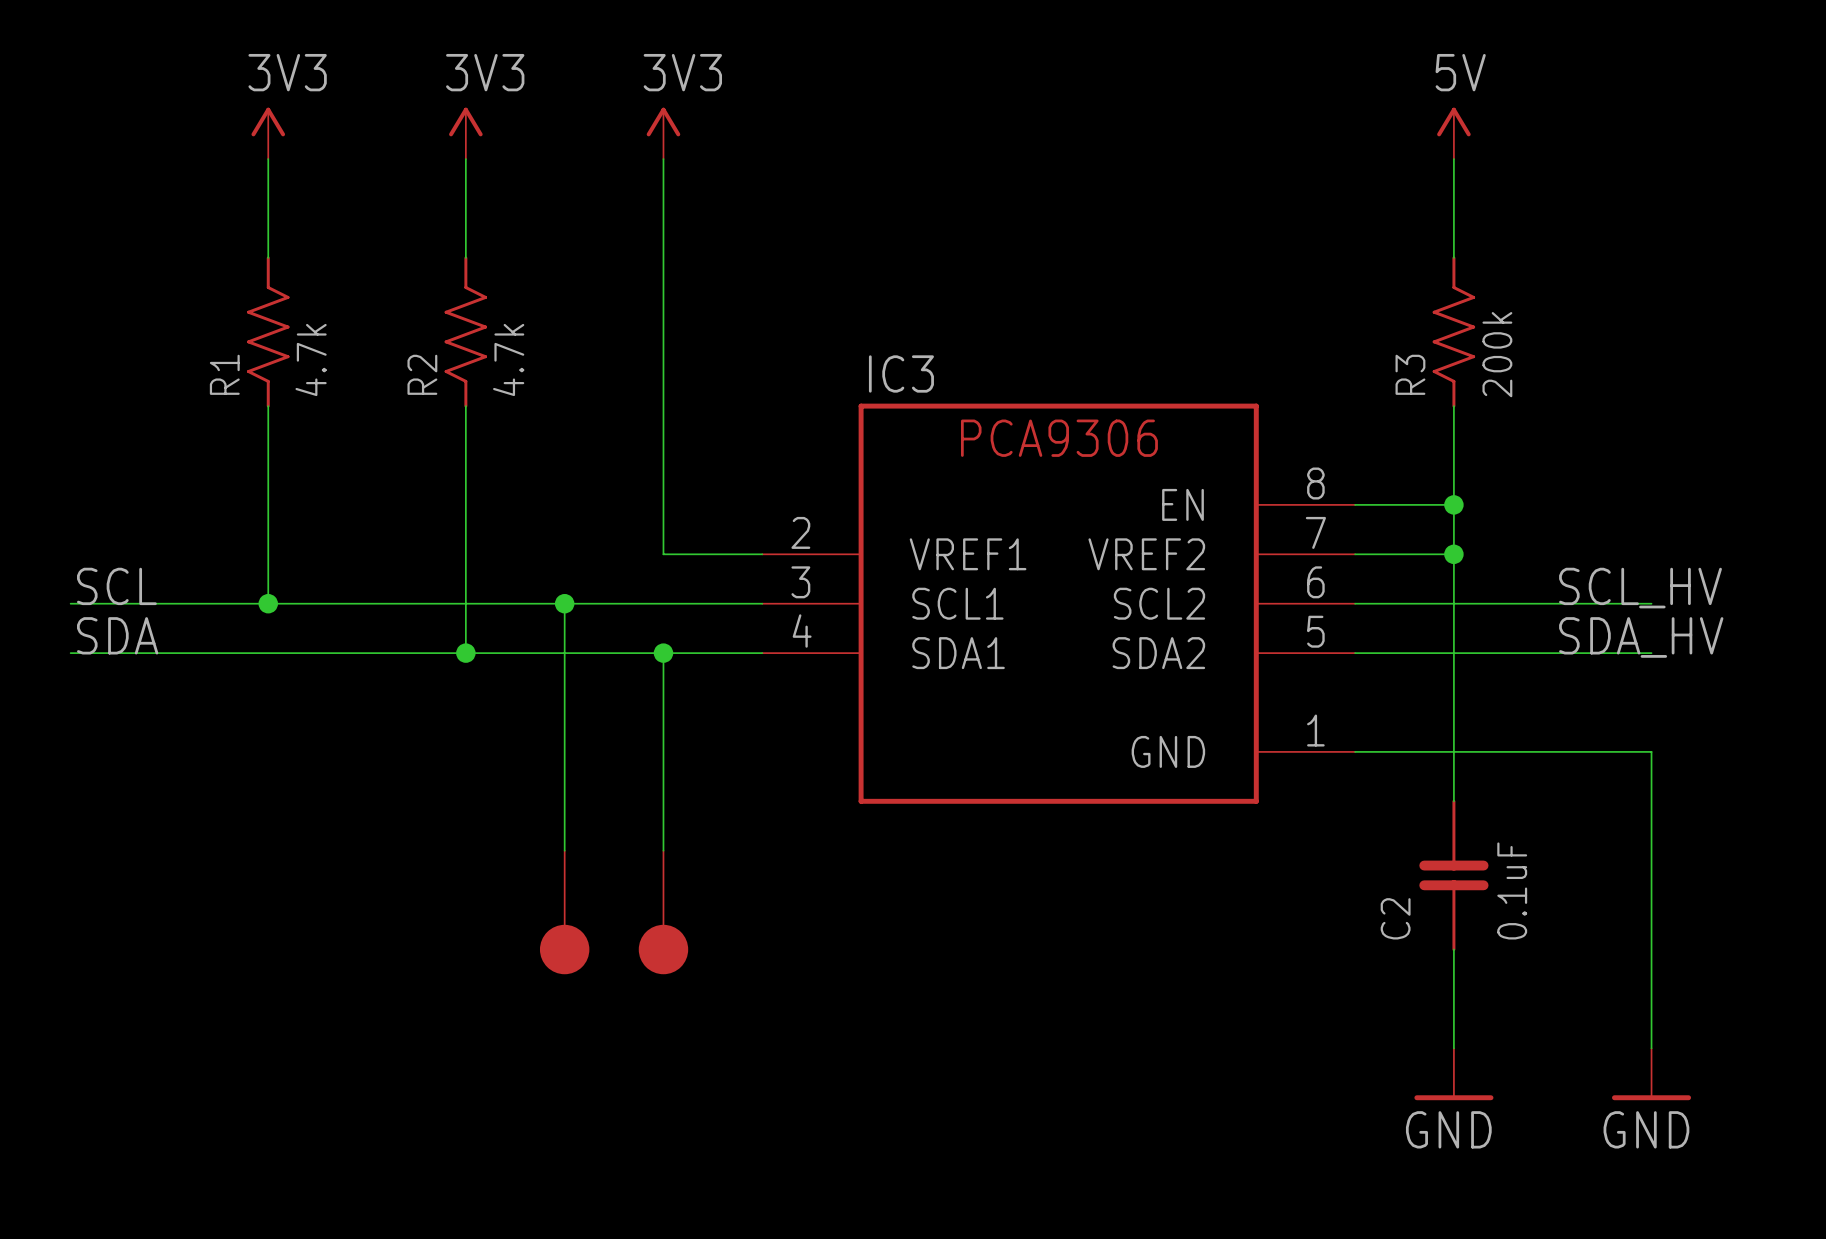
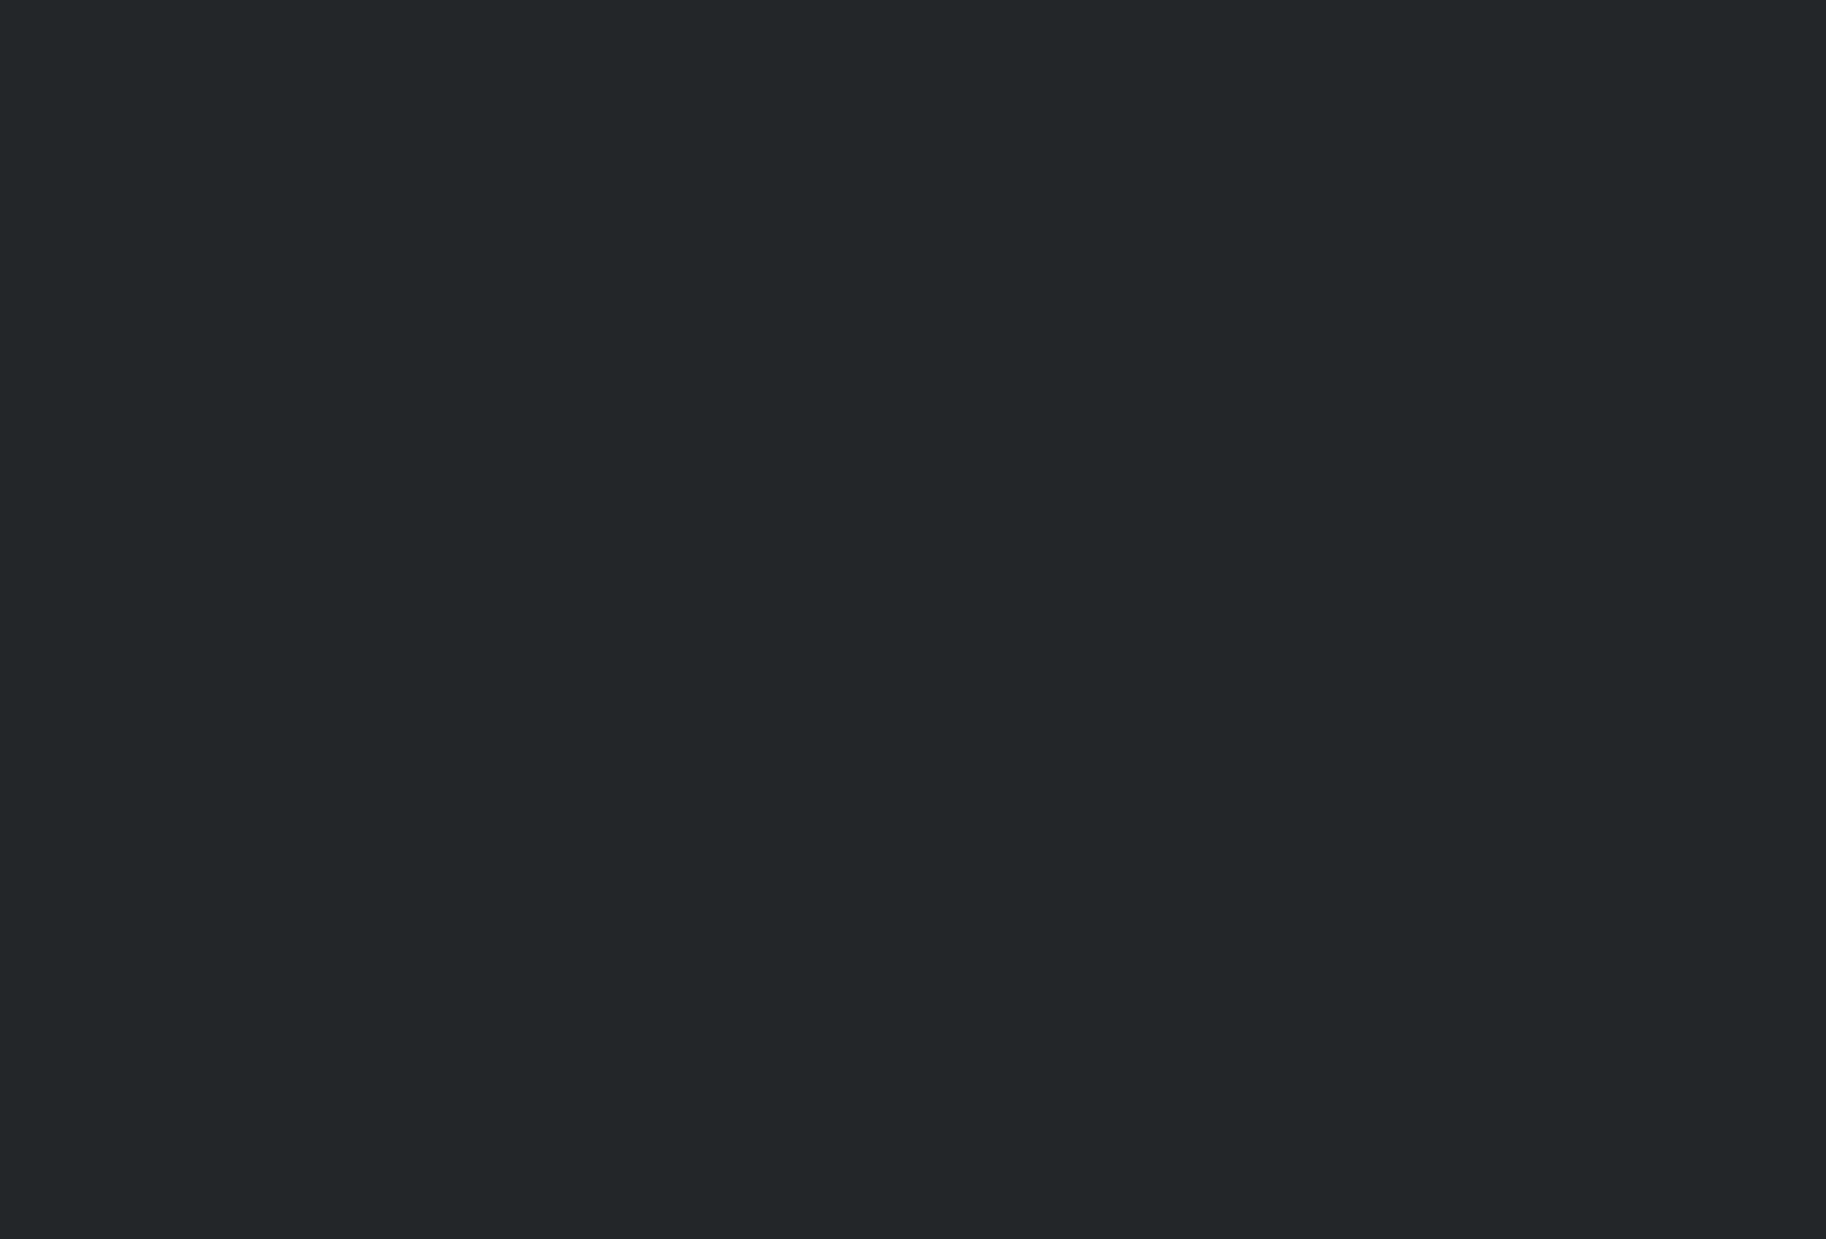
power symbol: 3V3 (268, 133) -> none
power symbol: 3V3 (465, 133) -> none
power symbol: 3V3 (663, 133) -> none
power symbol: 5V (1453, 133) -> none
wire: (268, 159) (268, 257) -> none
wire: (465, 159) (465, 257) -> none
wire: (663, 159) (663, 554) (762, 554) -> none
wire: (1453, 159) (1453, 257) -> none
R1: 4.7k (268, 331) -> none
R2: 4.7k (465, 331) -> none
R3: 200k (1453, 331) -> none
wire: (268, 406) (268, 603) -> none
wire: (465, 406) (465, 653) -> none
wire: (1453, 406) (1453, 801) -> none
wire: (1355, 504) (1453, 504) -> none
junction: (1453, 504) -> none
wire: (1355, 554) (1453, 554) -> none
junction: (1453, 554) -> none
label: SCL (116, 586) -> none
label: SCL_HV (1640, 588) -> none
wire: (70, 603) (762, 603) -> none
junction: (268, 603) -> none
wire: (564, 603) (564, 850) -> none
junction: (564, 603) -> none
IC3: (1058, 603) -> none
wire: (1355, 603) (1651, 603) -> none
label: SDA (117, 635) -> none
label: SDA_HV (1641, 637) -> none
wire: (70, 653) (762, 653) -> none
junction: (465, 653) -> none
wire: (663, 653) (663, 850) -> none
junction: (663, 653) -> none
wire: (1355, 653) (1651, 653) -> none
wire: (1355, 751) (1651, 751) (1651, 1048) -> none
C2: 0.1uF (1453, 875) -> none
part: (564, 912) -> none
part: (663, 912) -> none
wire: (1453, 949) (1453, 1048) -> none
power symbol: GND (1453, 1074) -> none
power symbol: GND (1651, 1074) -> none

